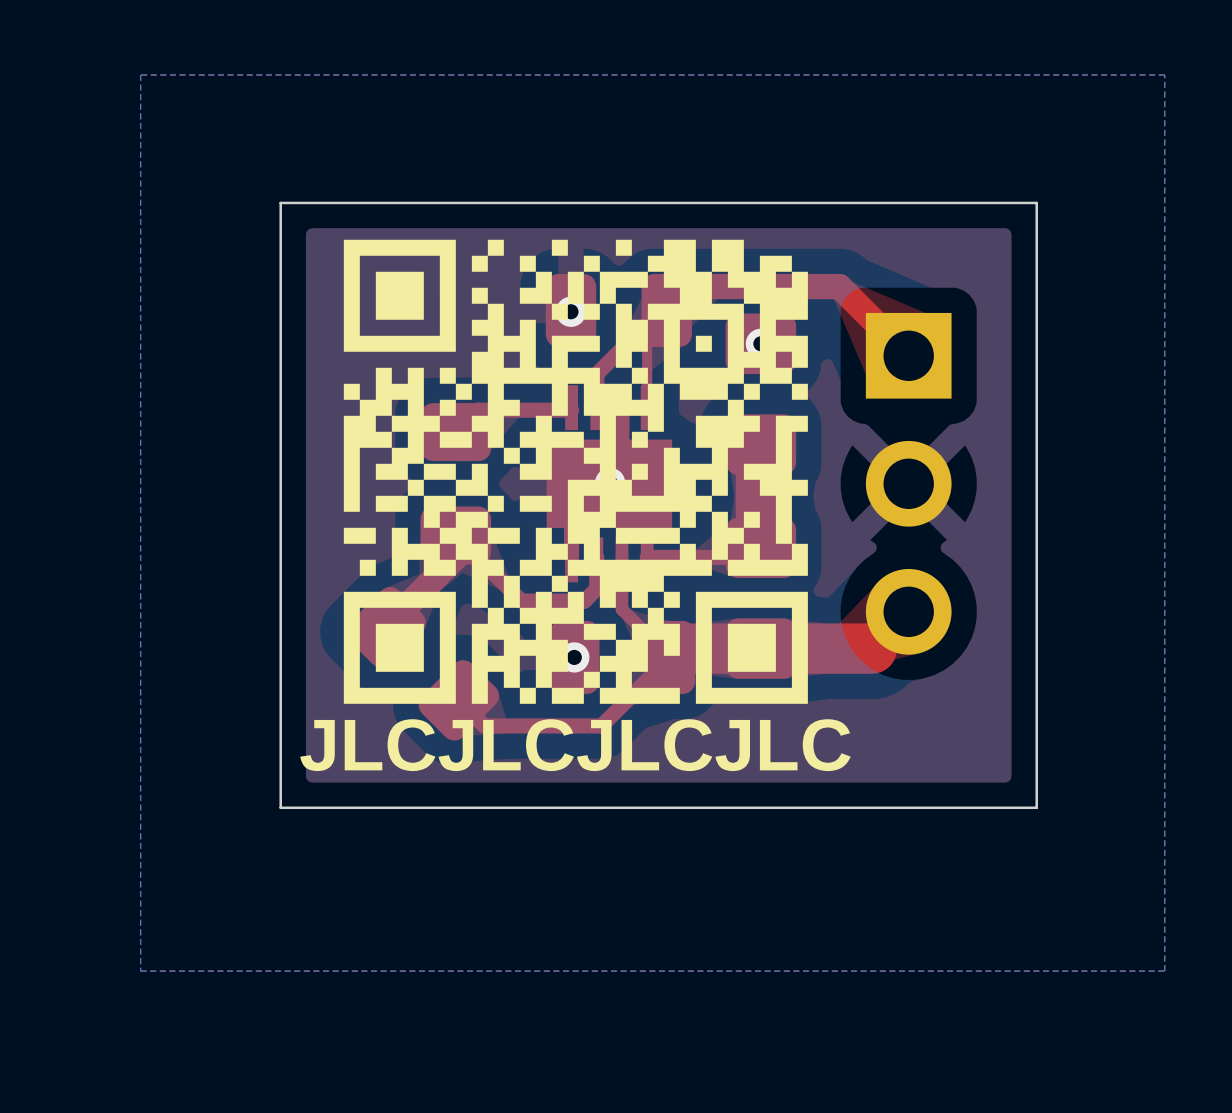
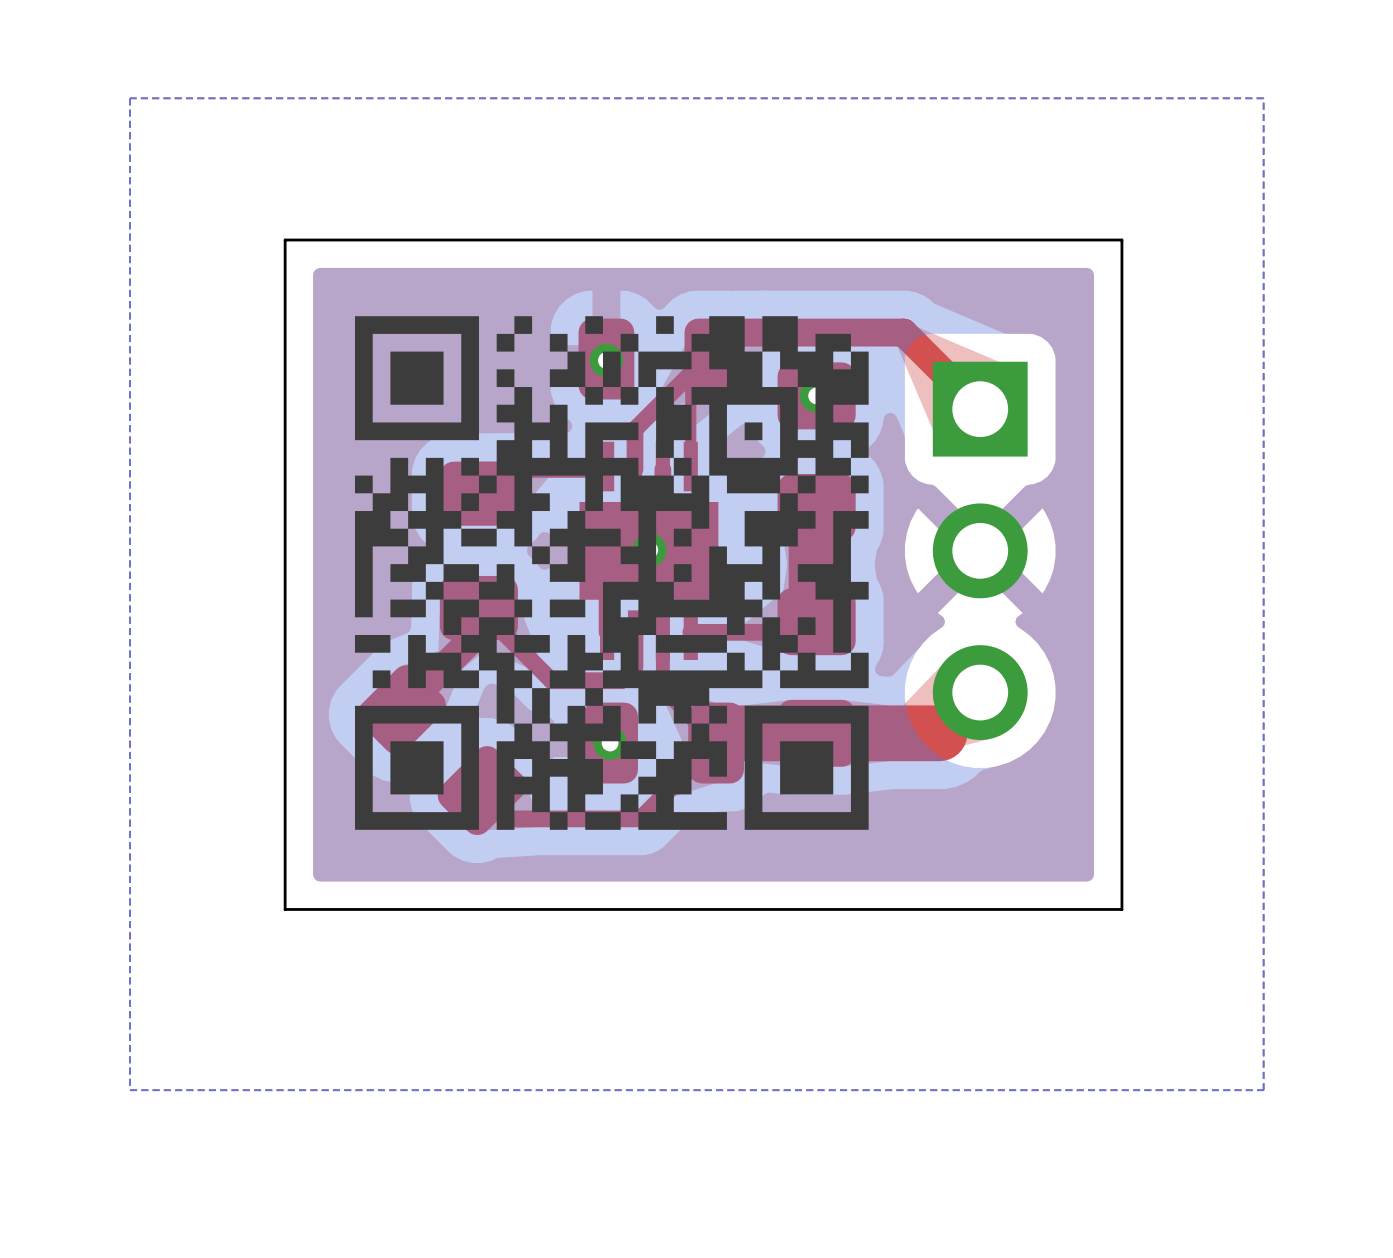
drawing position: (575, 471) -> (611, 573)
text: JLCJLCJLCJLC (575, 745) -> none

